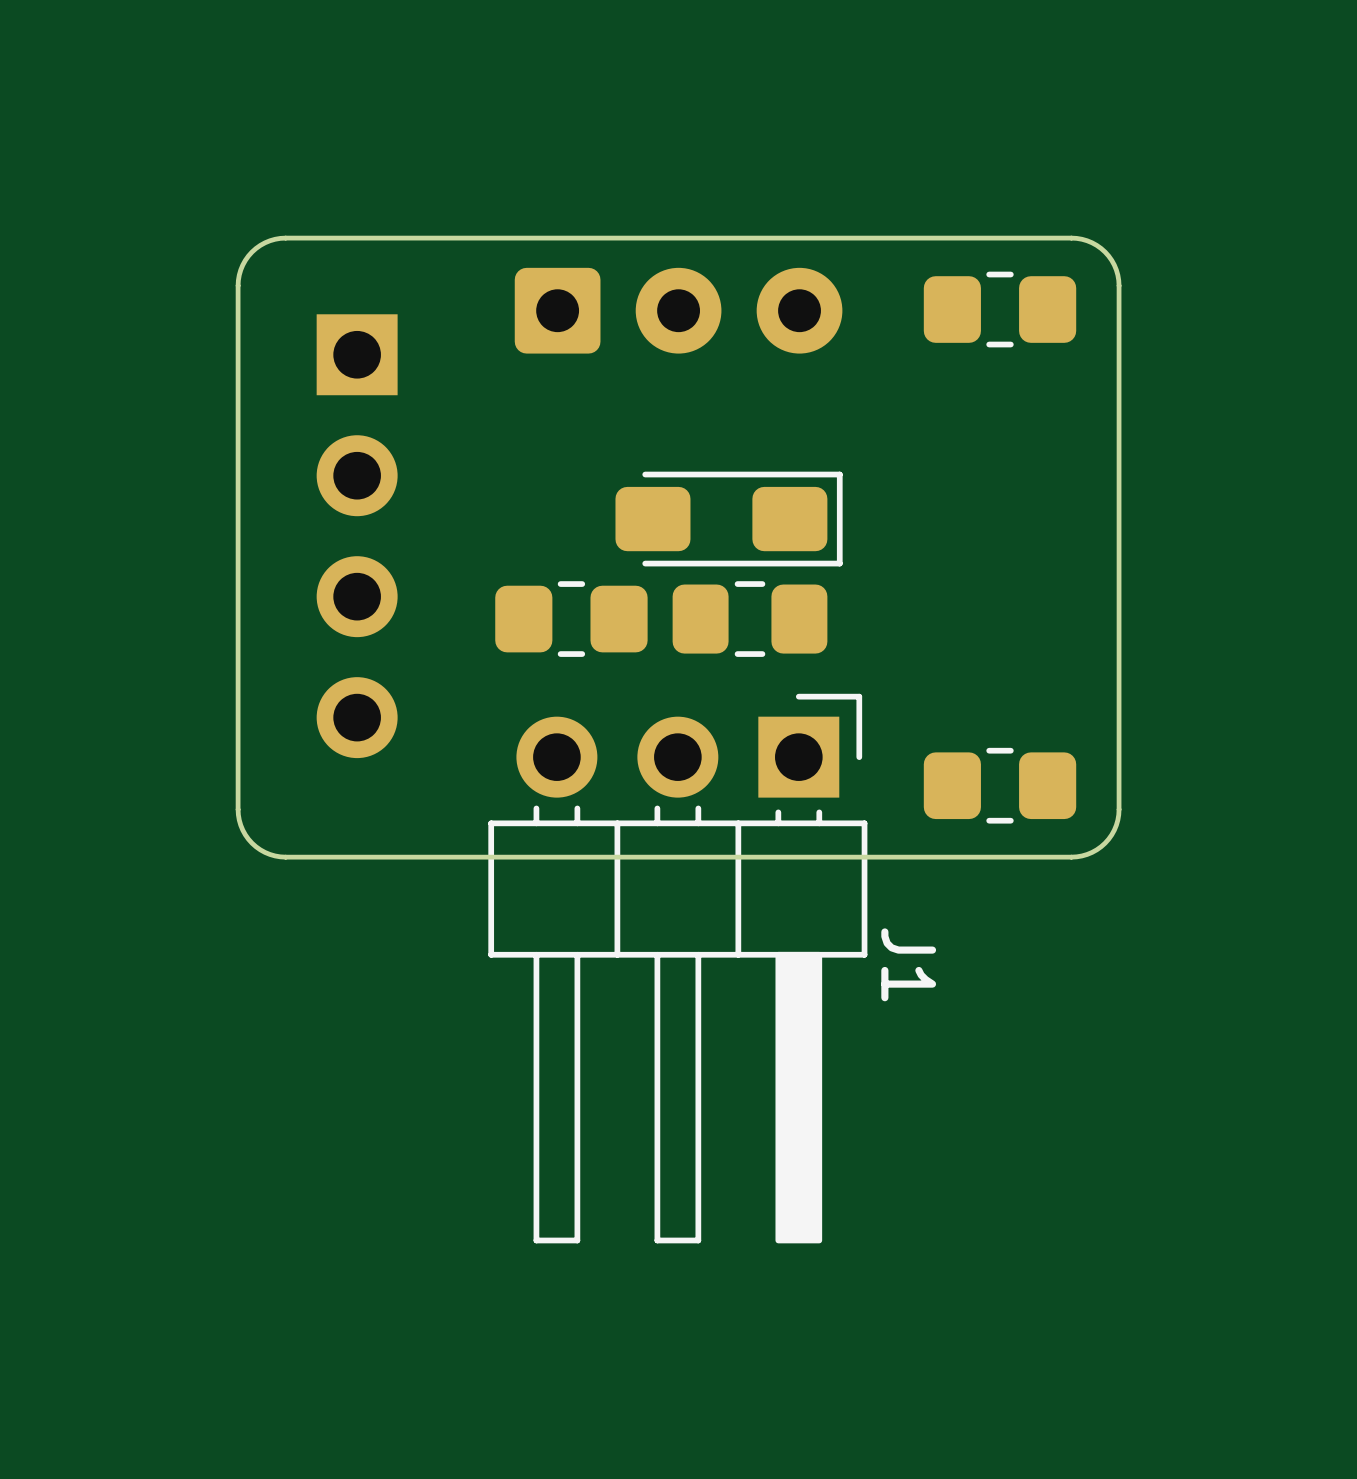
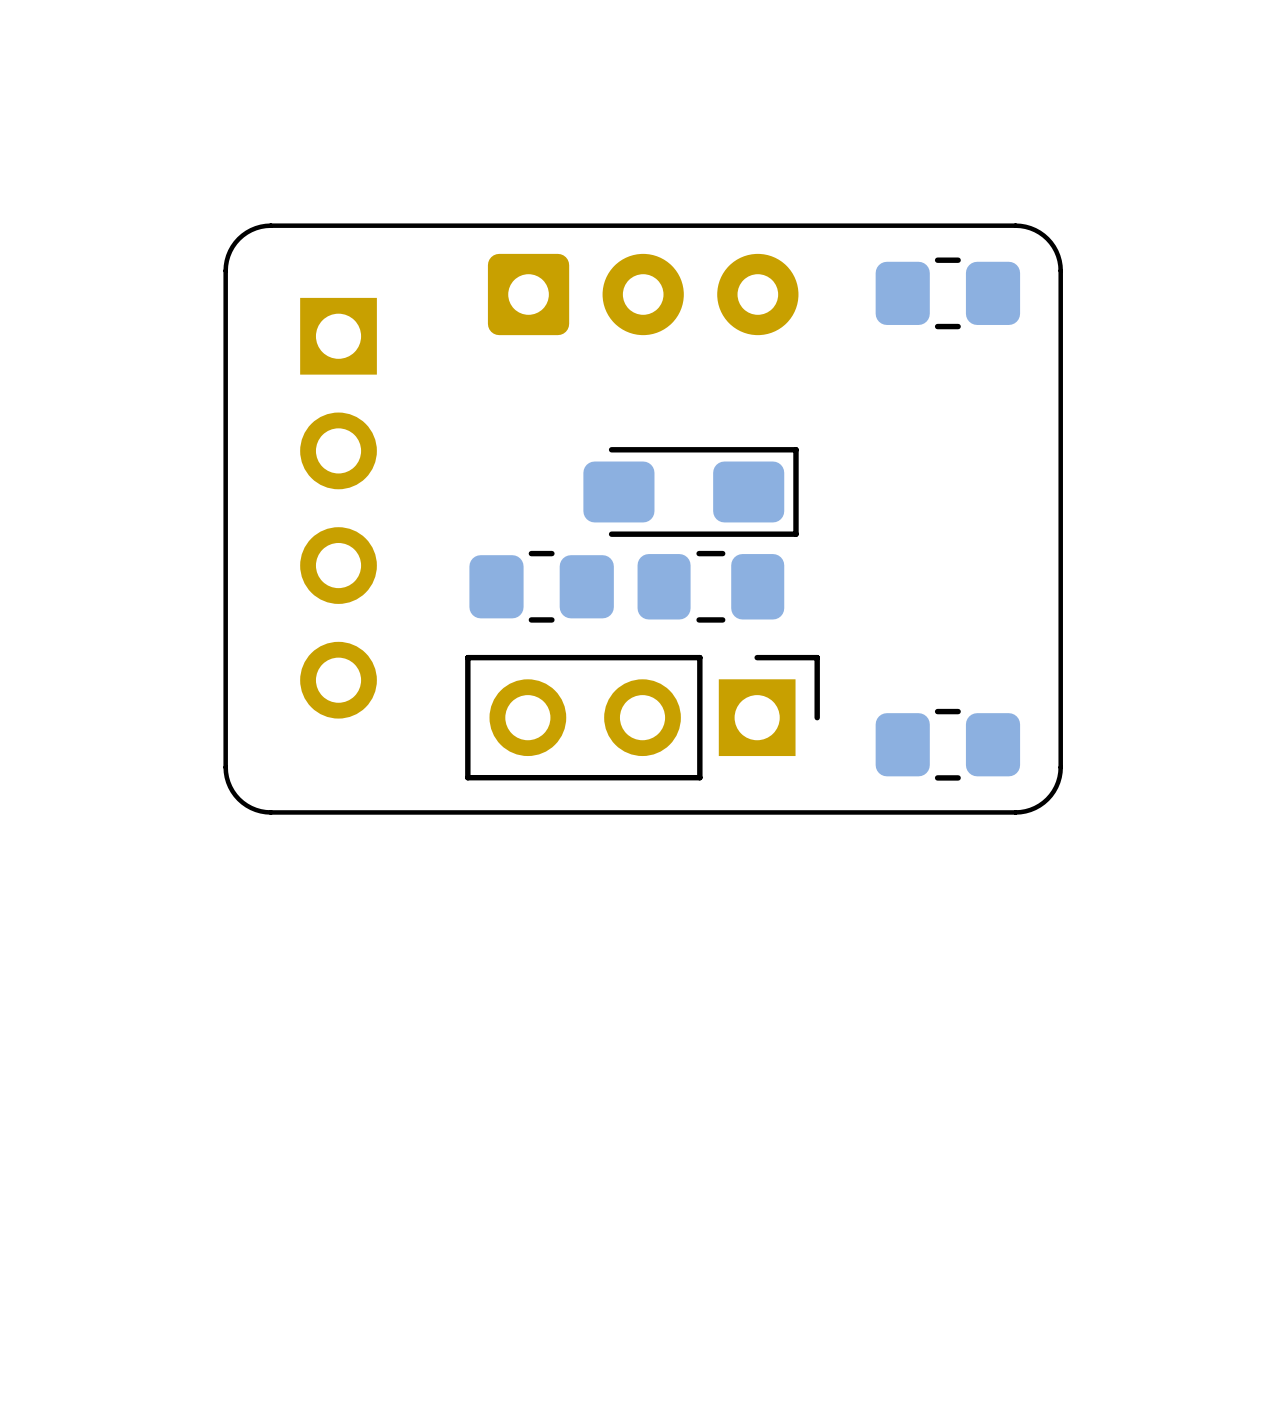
part: none -> (642, 717)
J1: (677, 968) -> none

